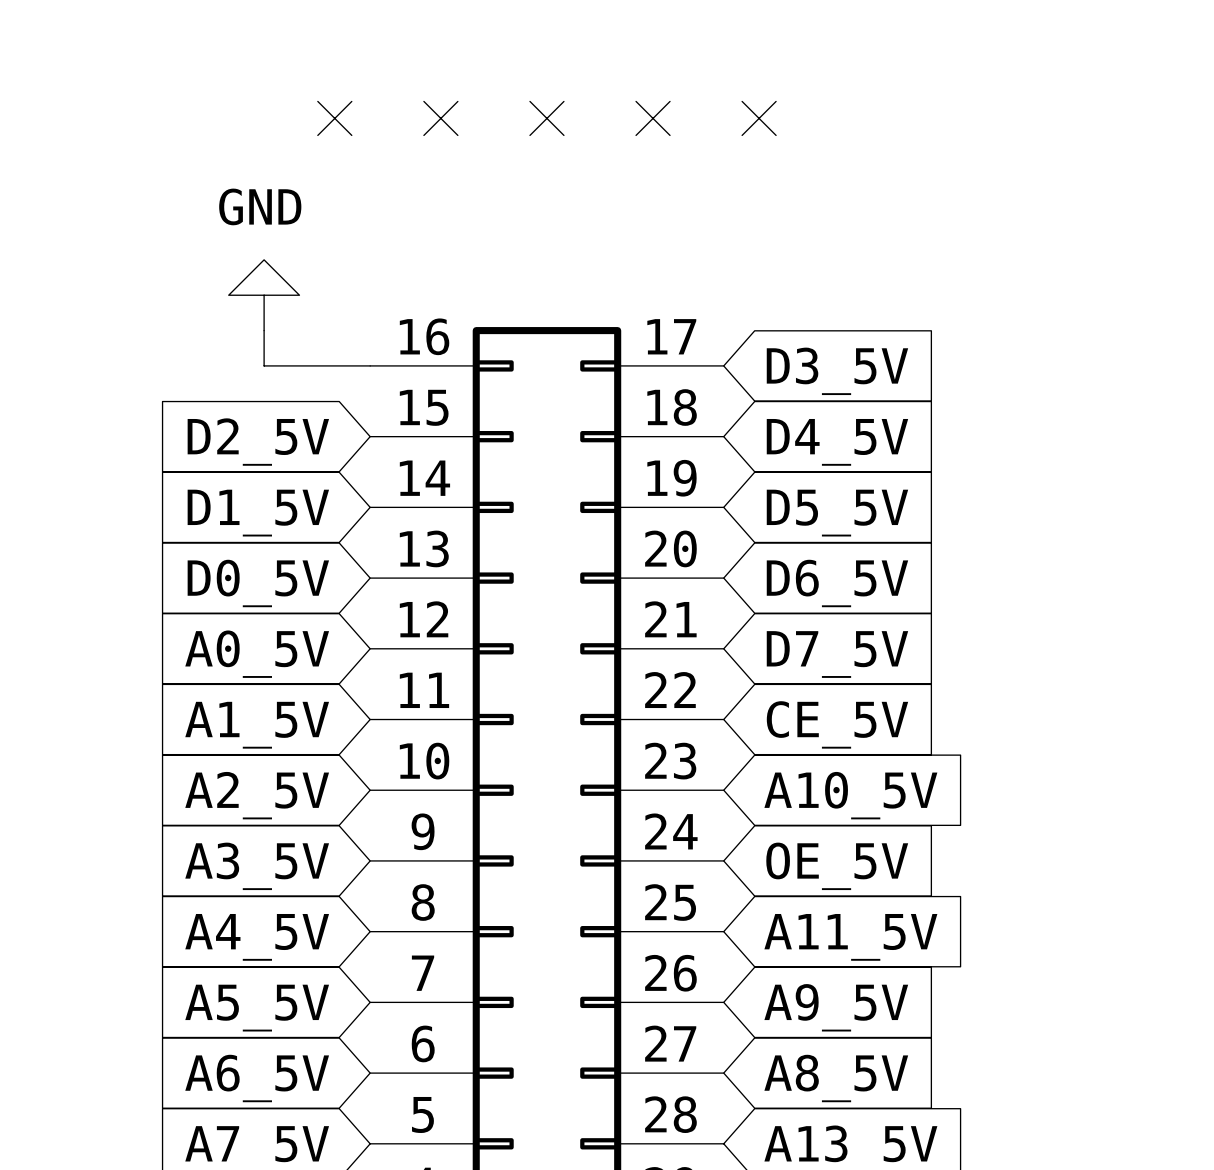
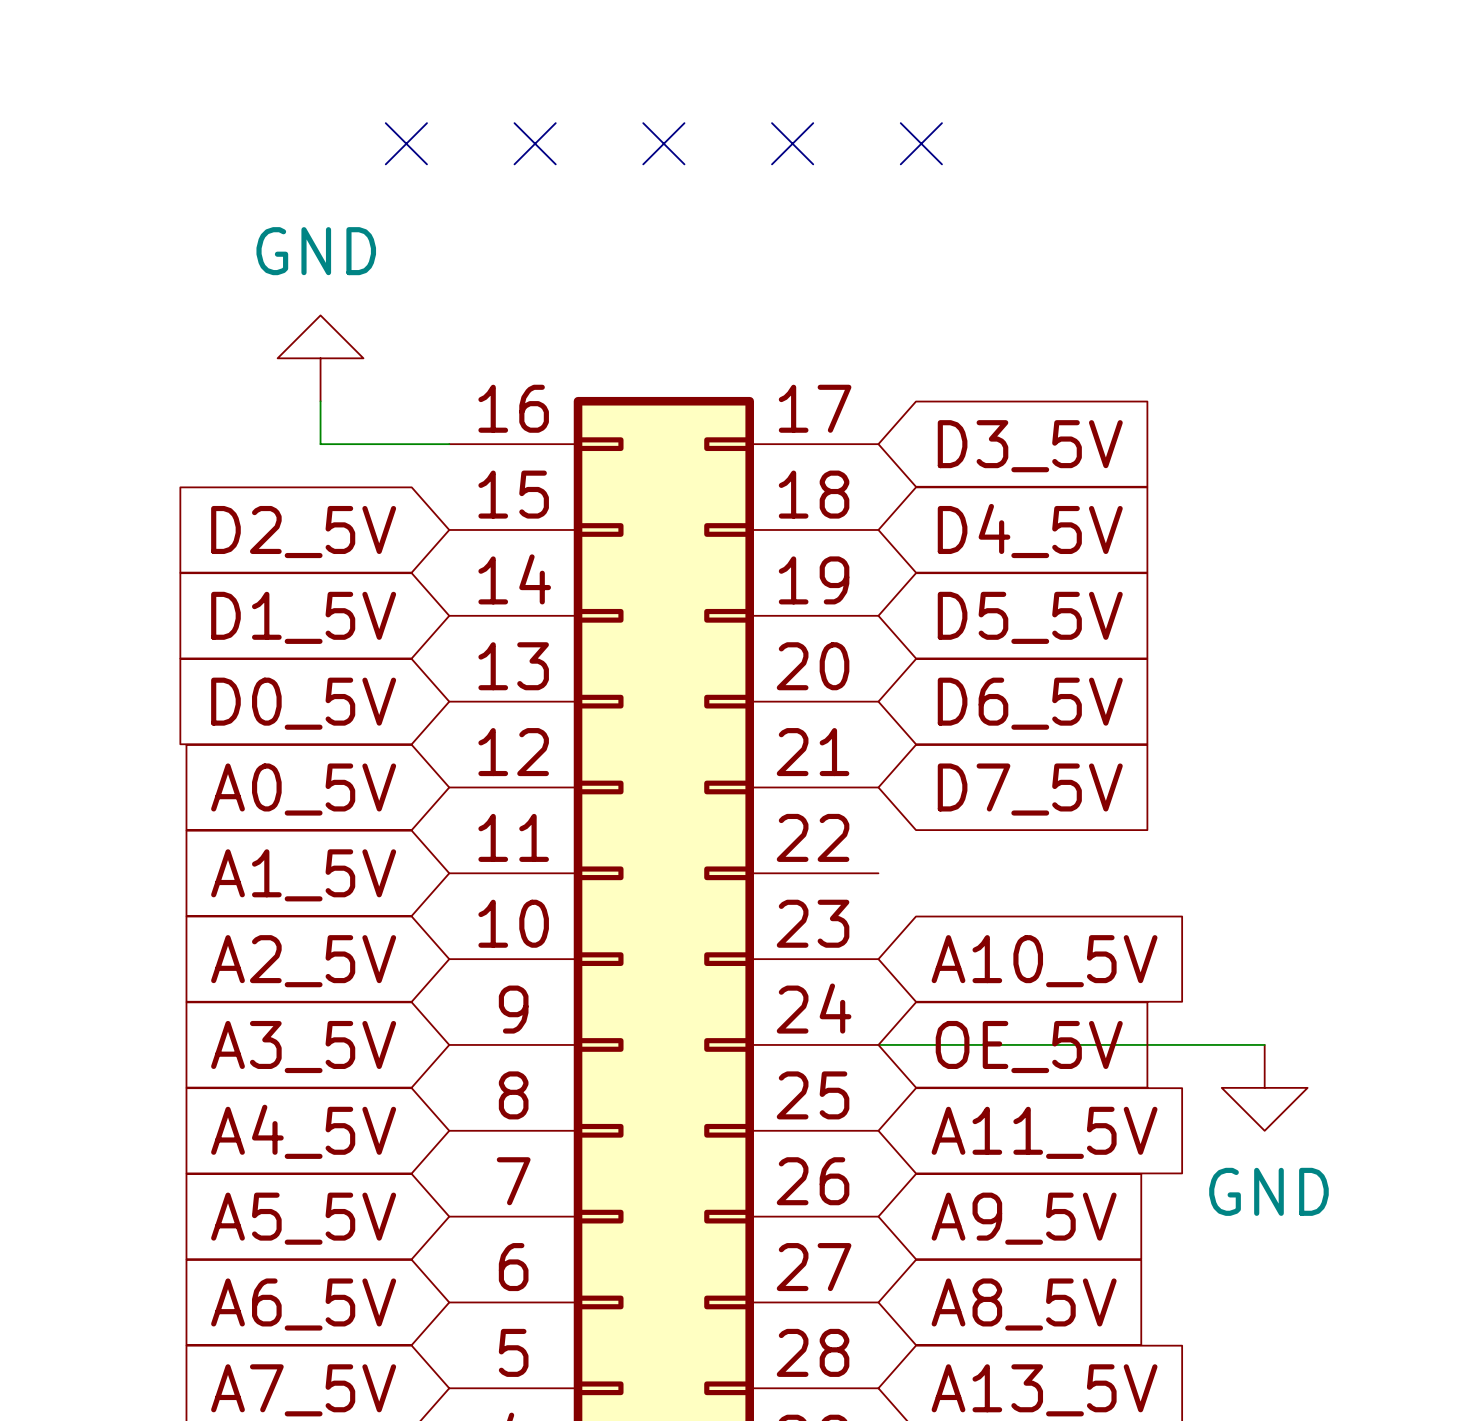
global label: CE_5V (837, 724) -> none
wire: none -> (878, 1044) (1264, 1044)
power symbol: none -> GND (1264, 1087)

